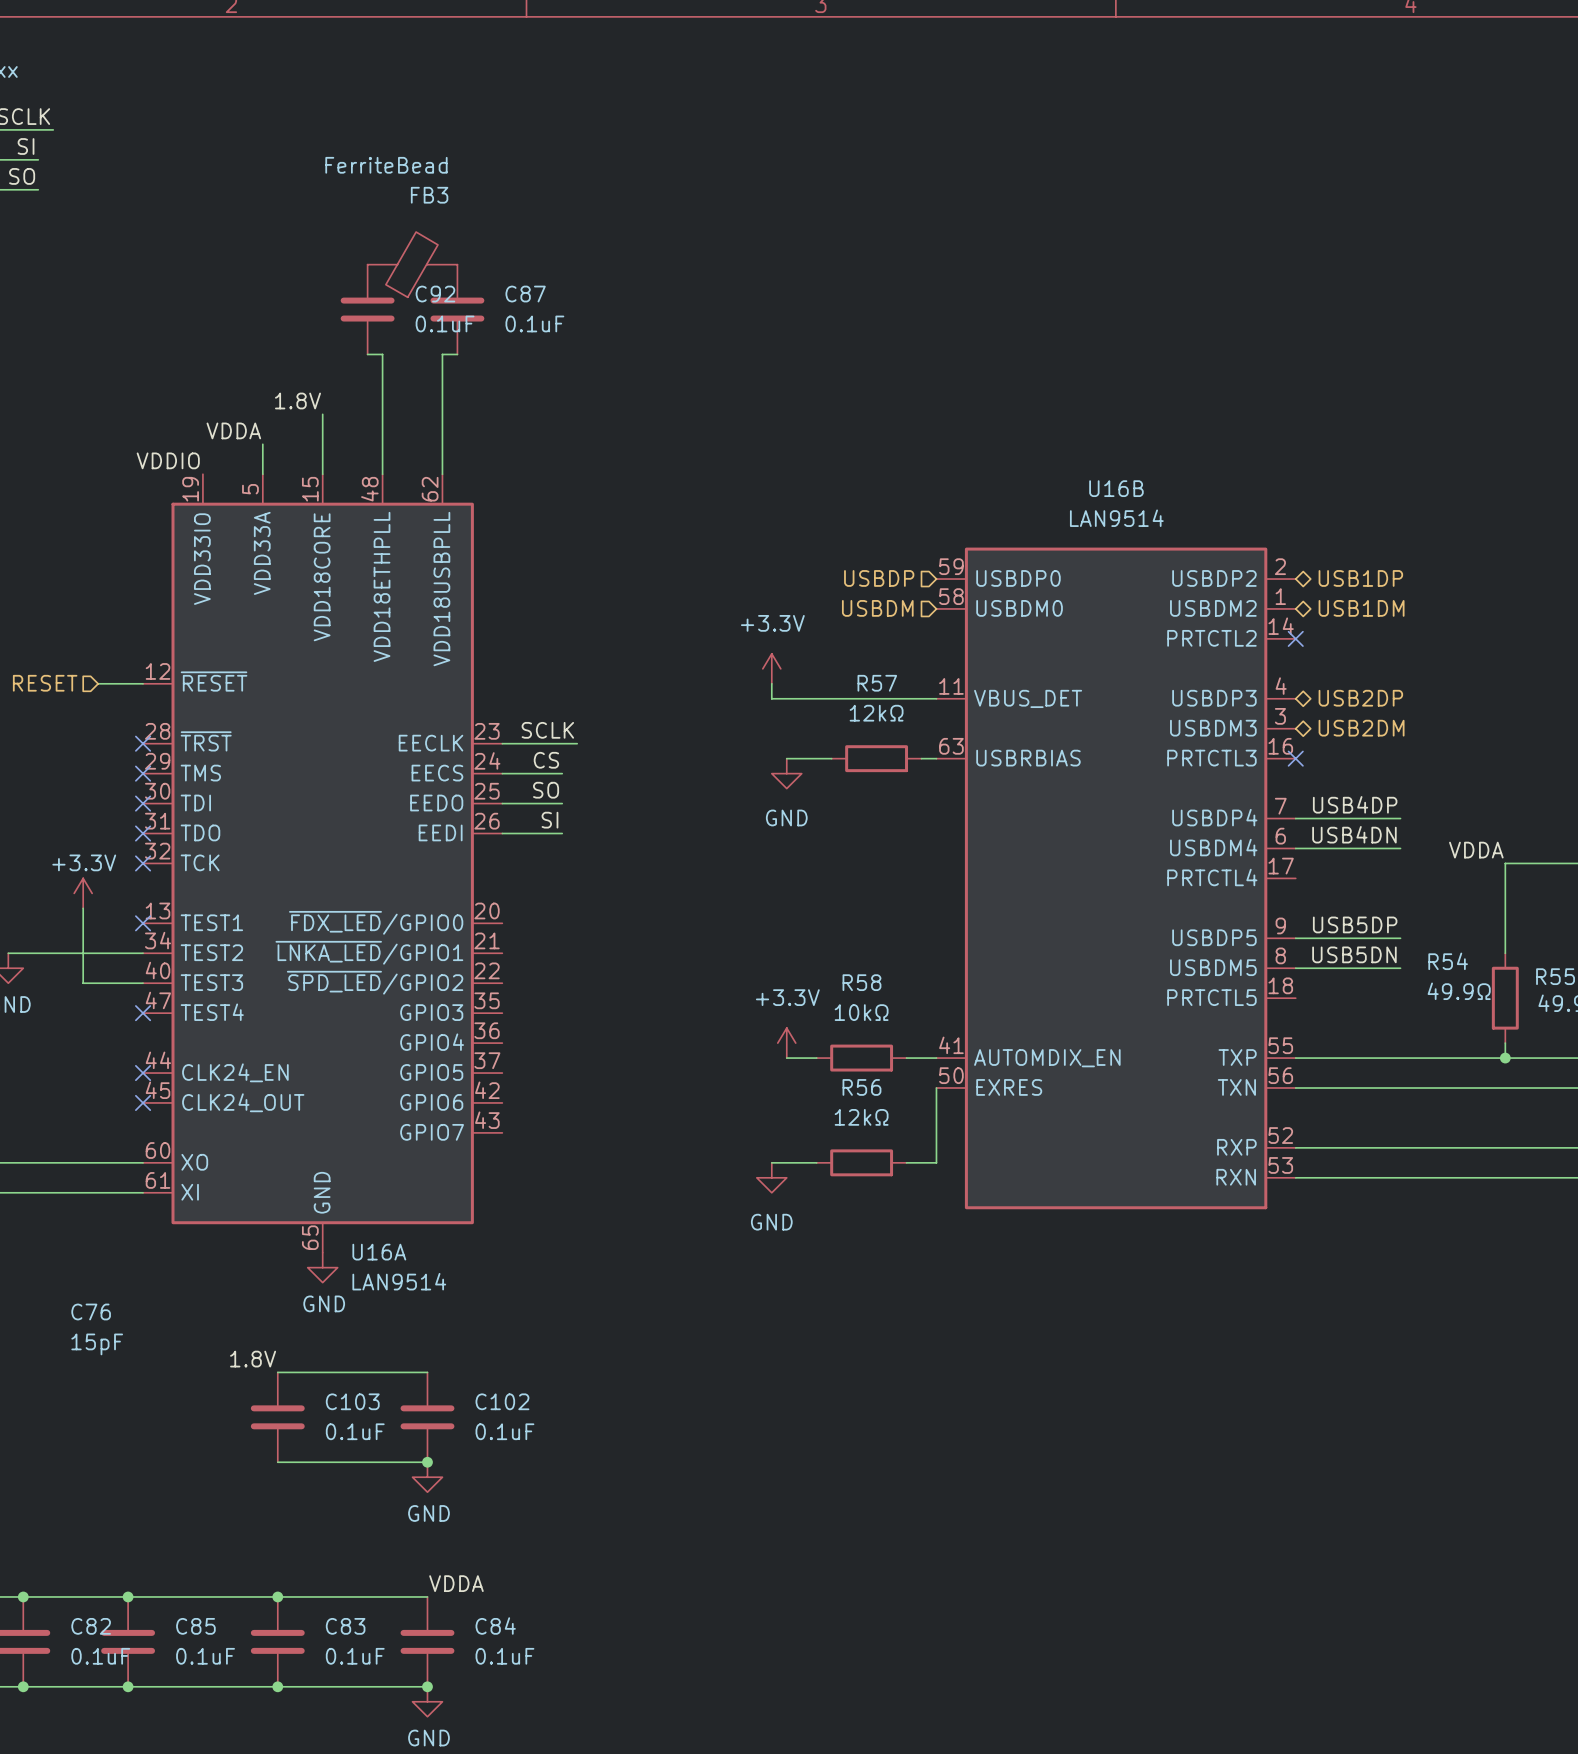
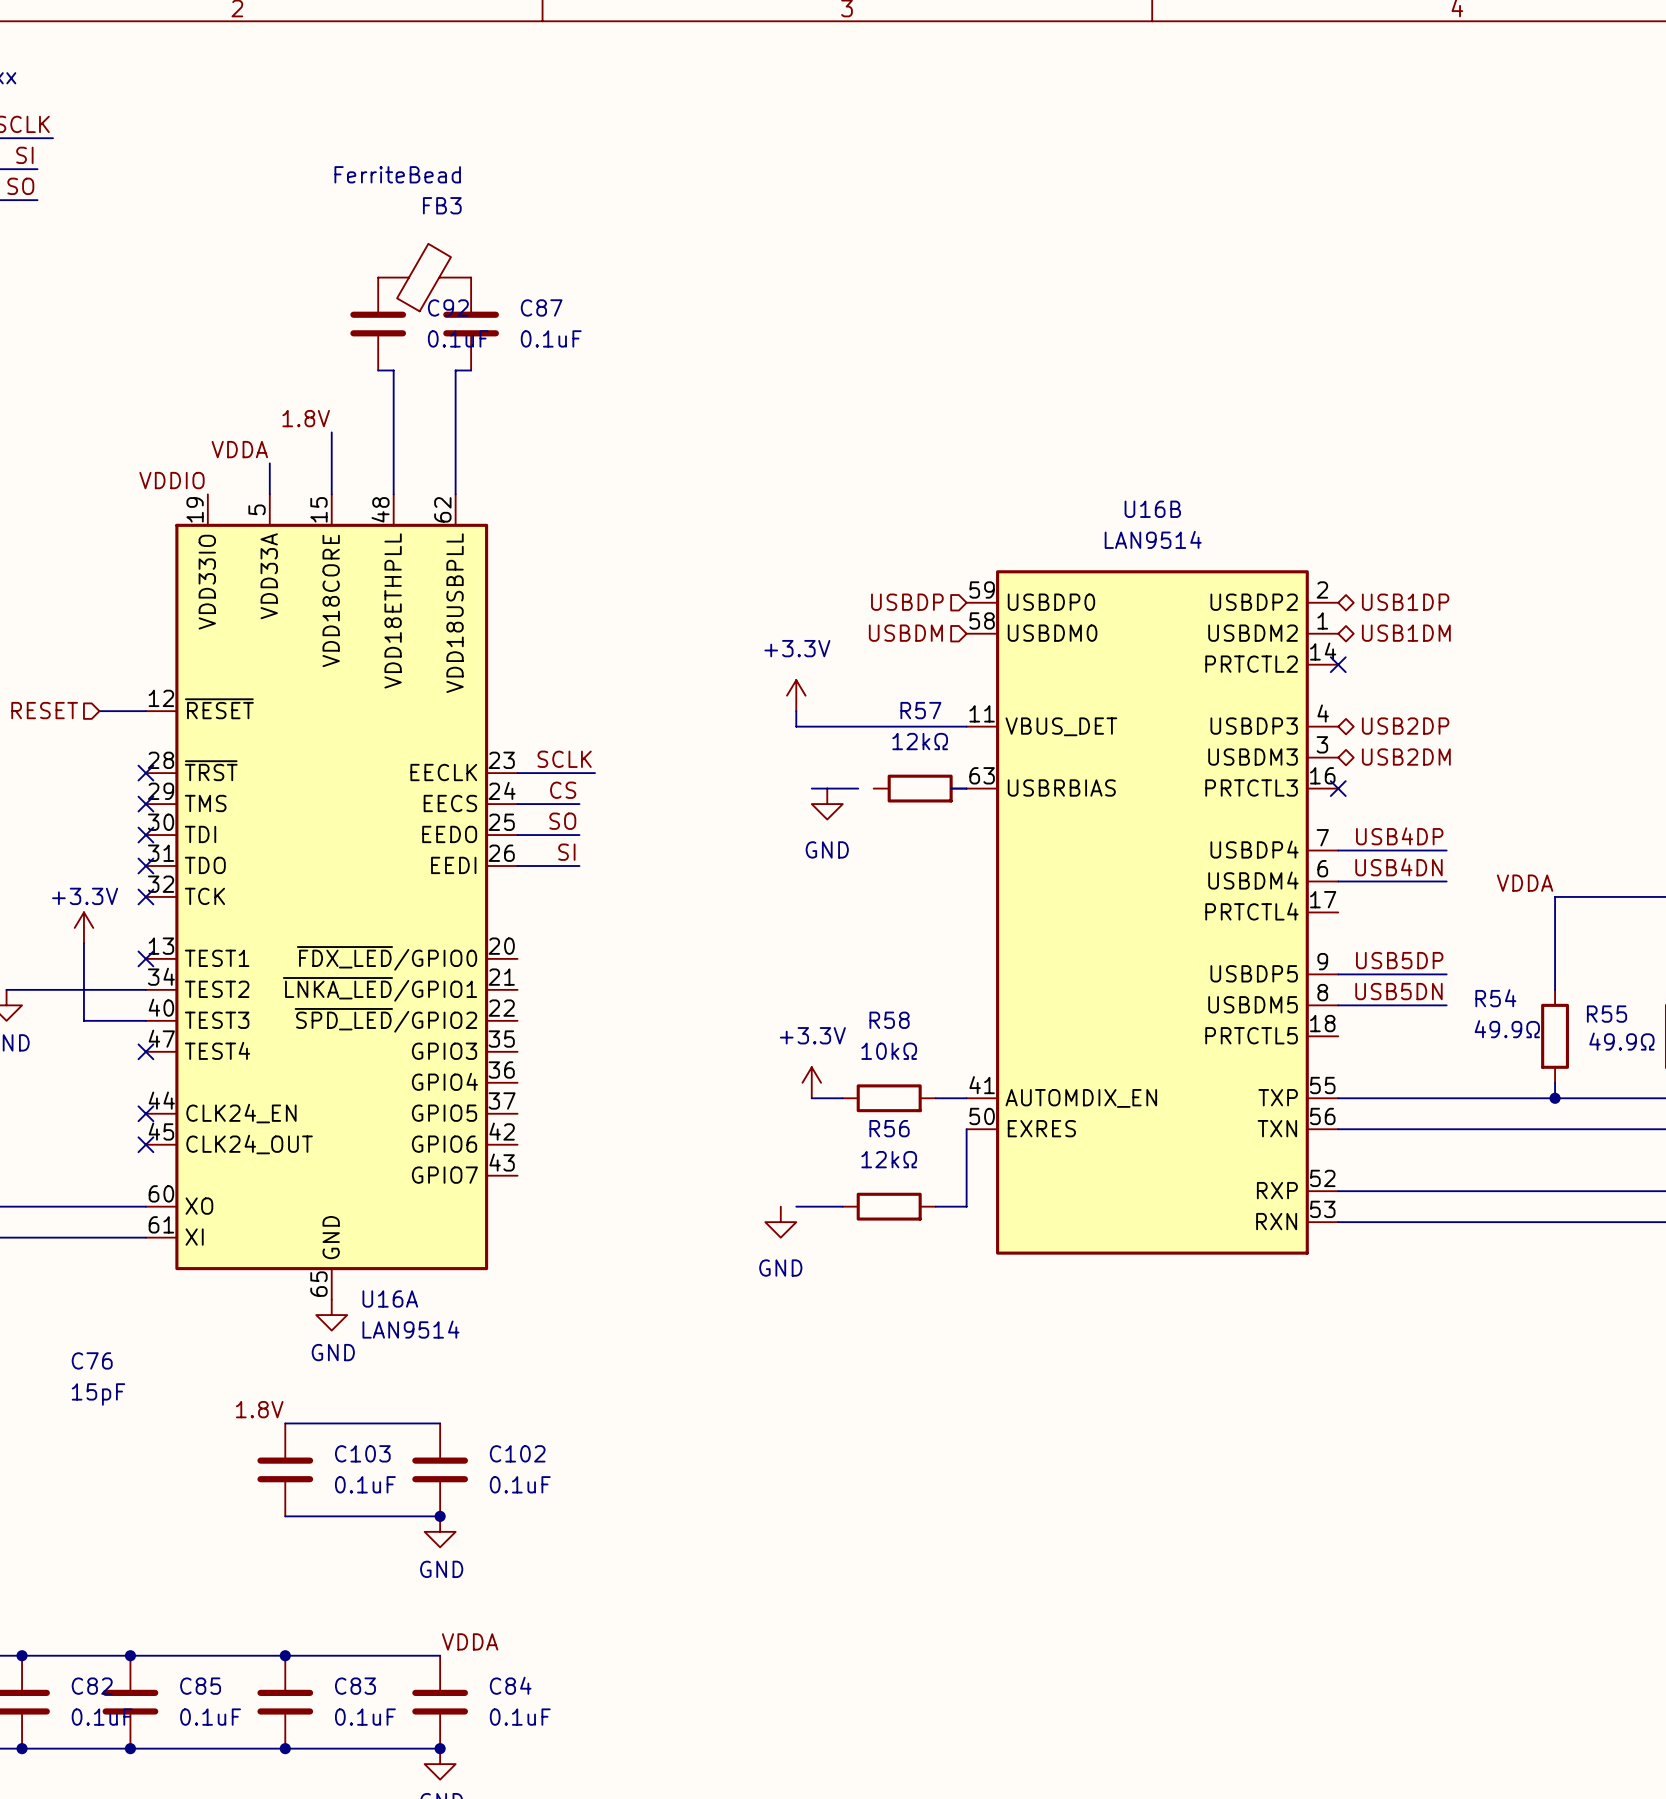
R57 position: (876, 758) -> (920, 788)
power symbol position: GND (786, 773) -> GND (827, 804)
power symbol position: GND (771, 1177) -> GND (780, 1222)

